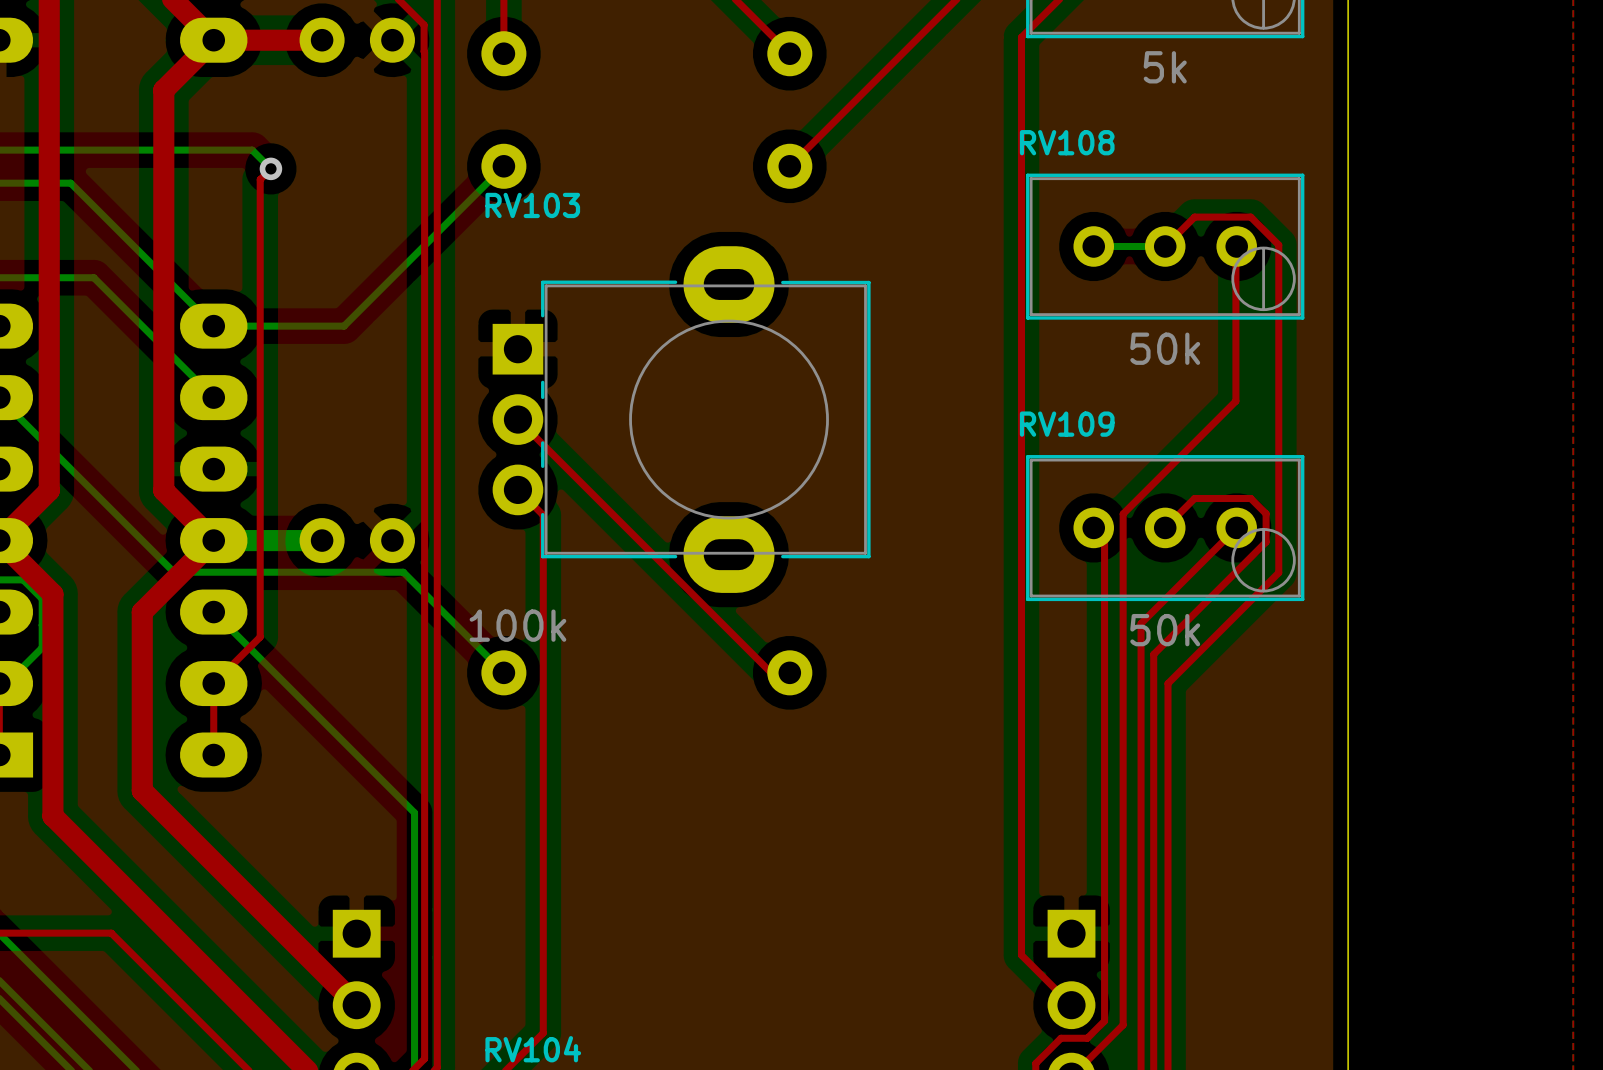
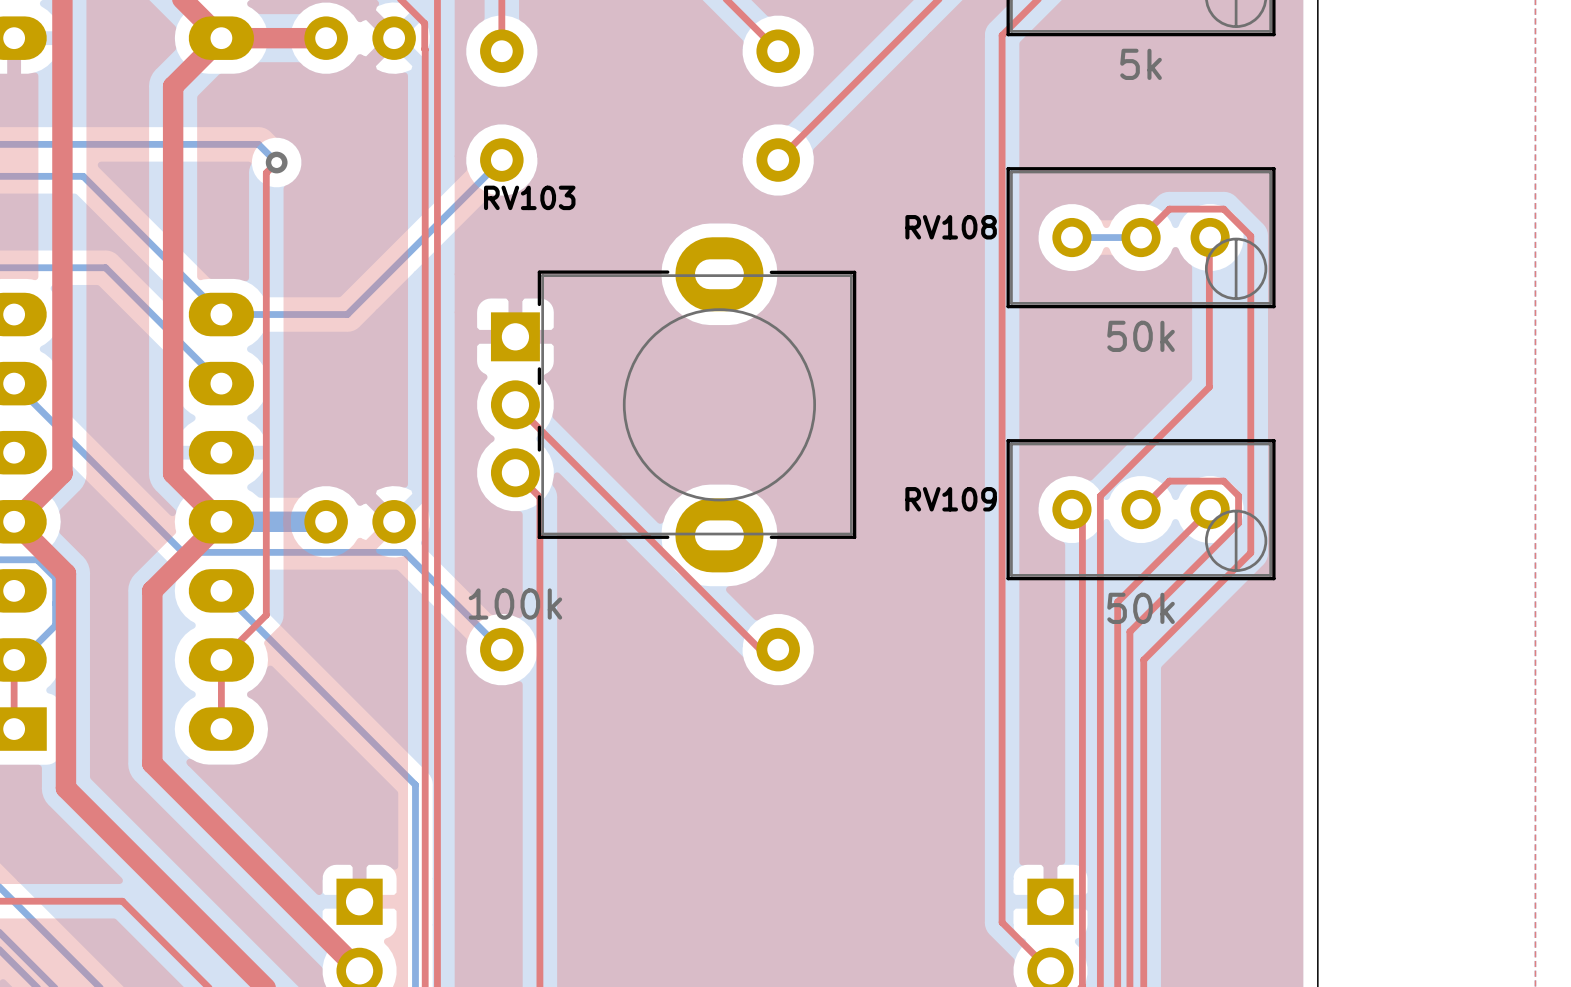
RV108 name position: RV108 (1067, 142) -> RV108 (951, 227)
RV109 name position: RV109 (1067, 424) -> RV109 (951, 499)

